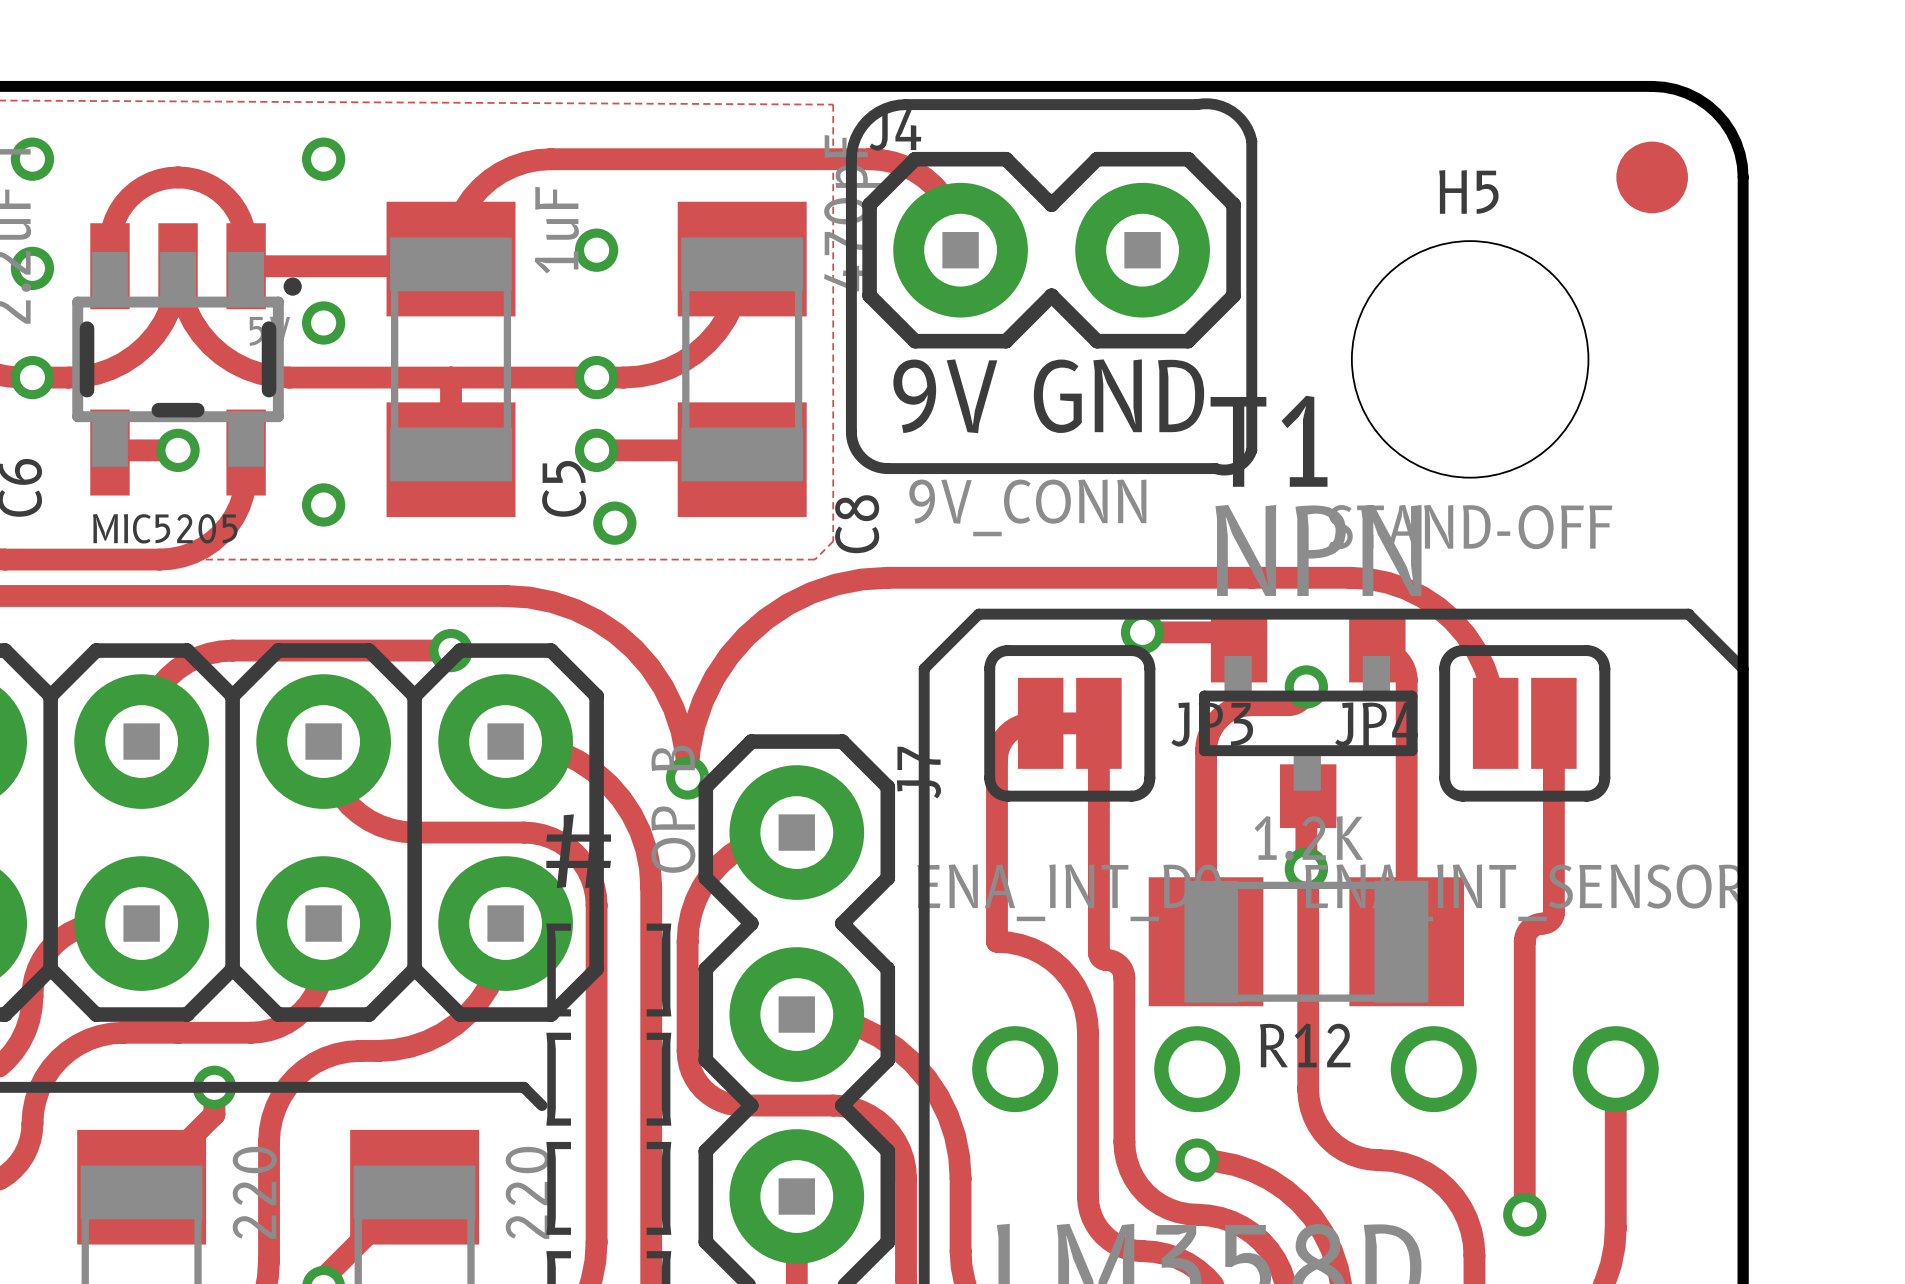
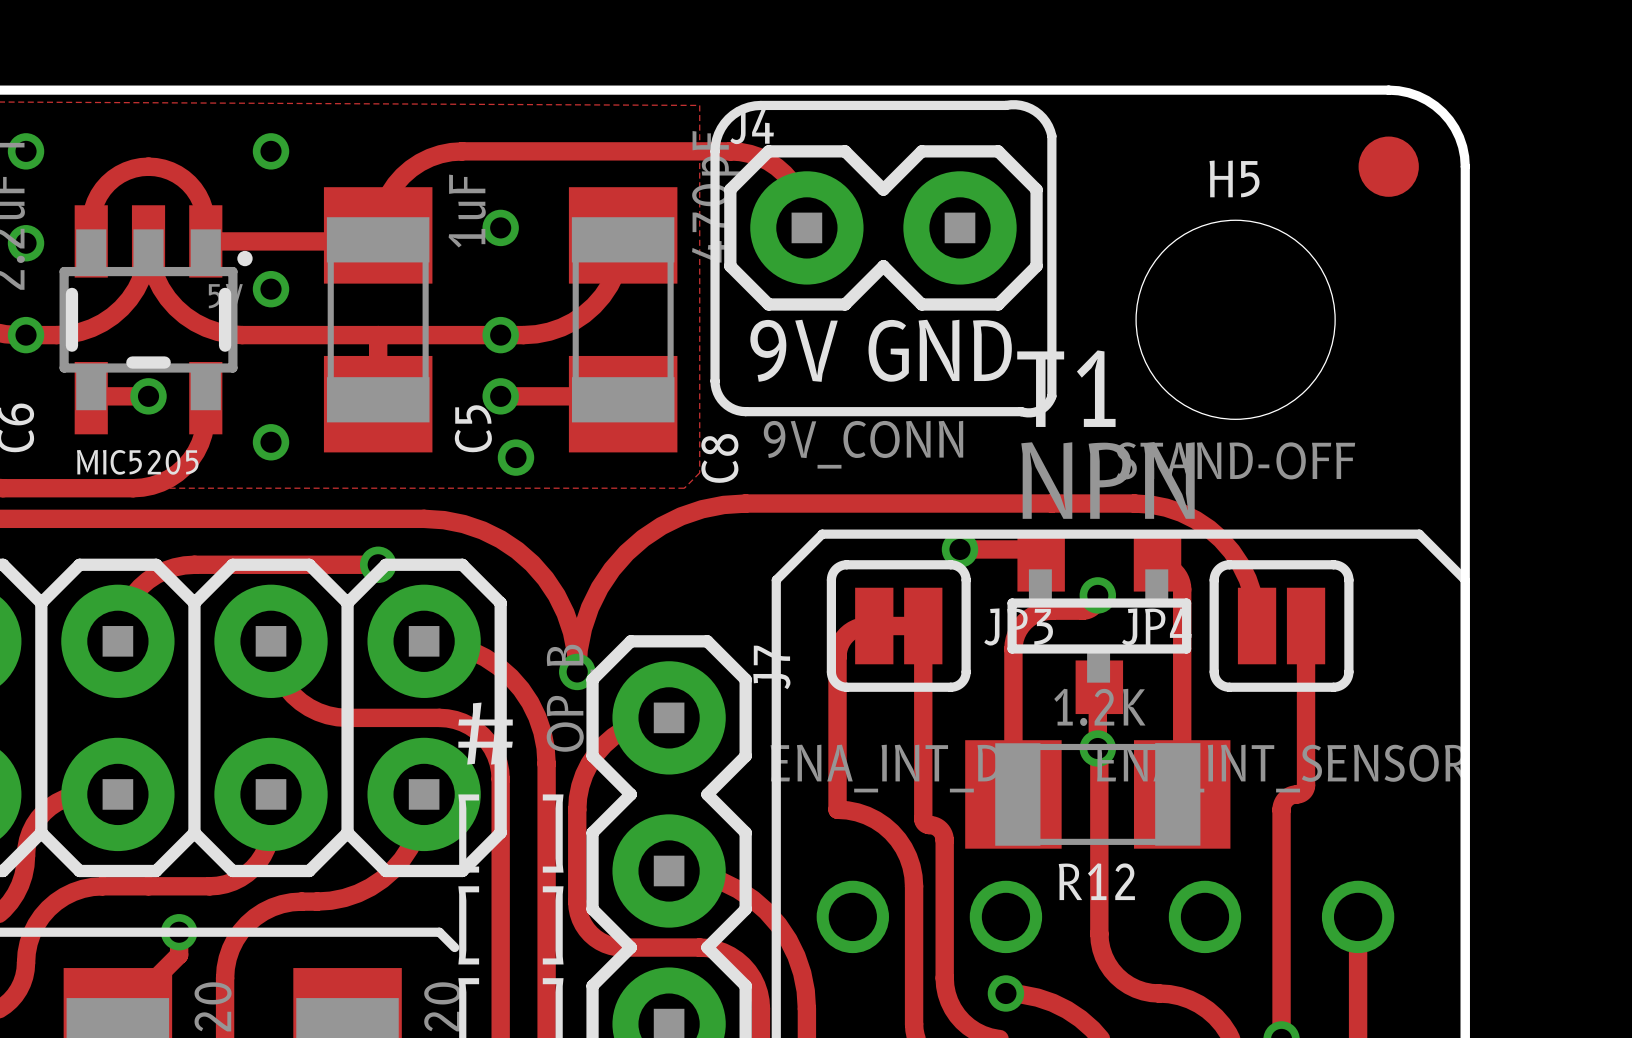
R12 position: (1306, 941) -> (1097, 794)

